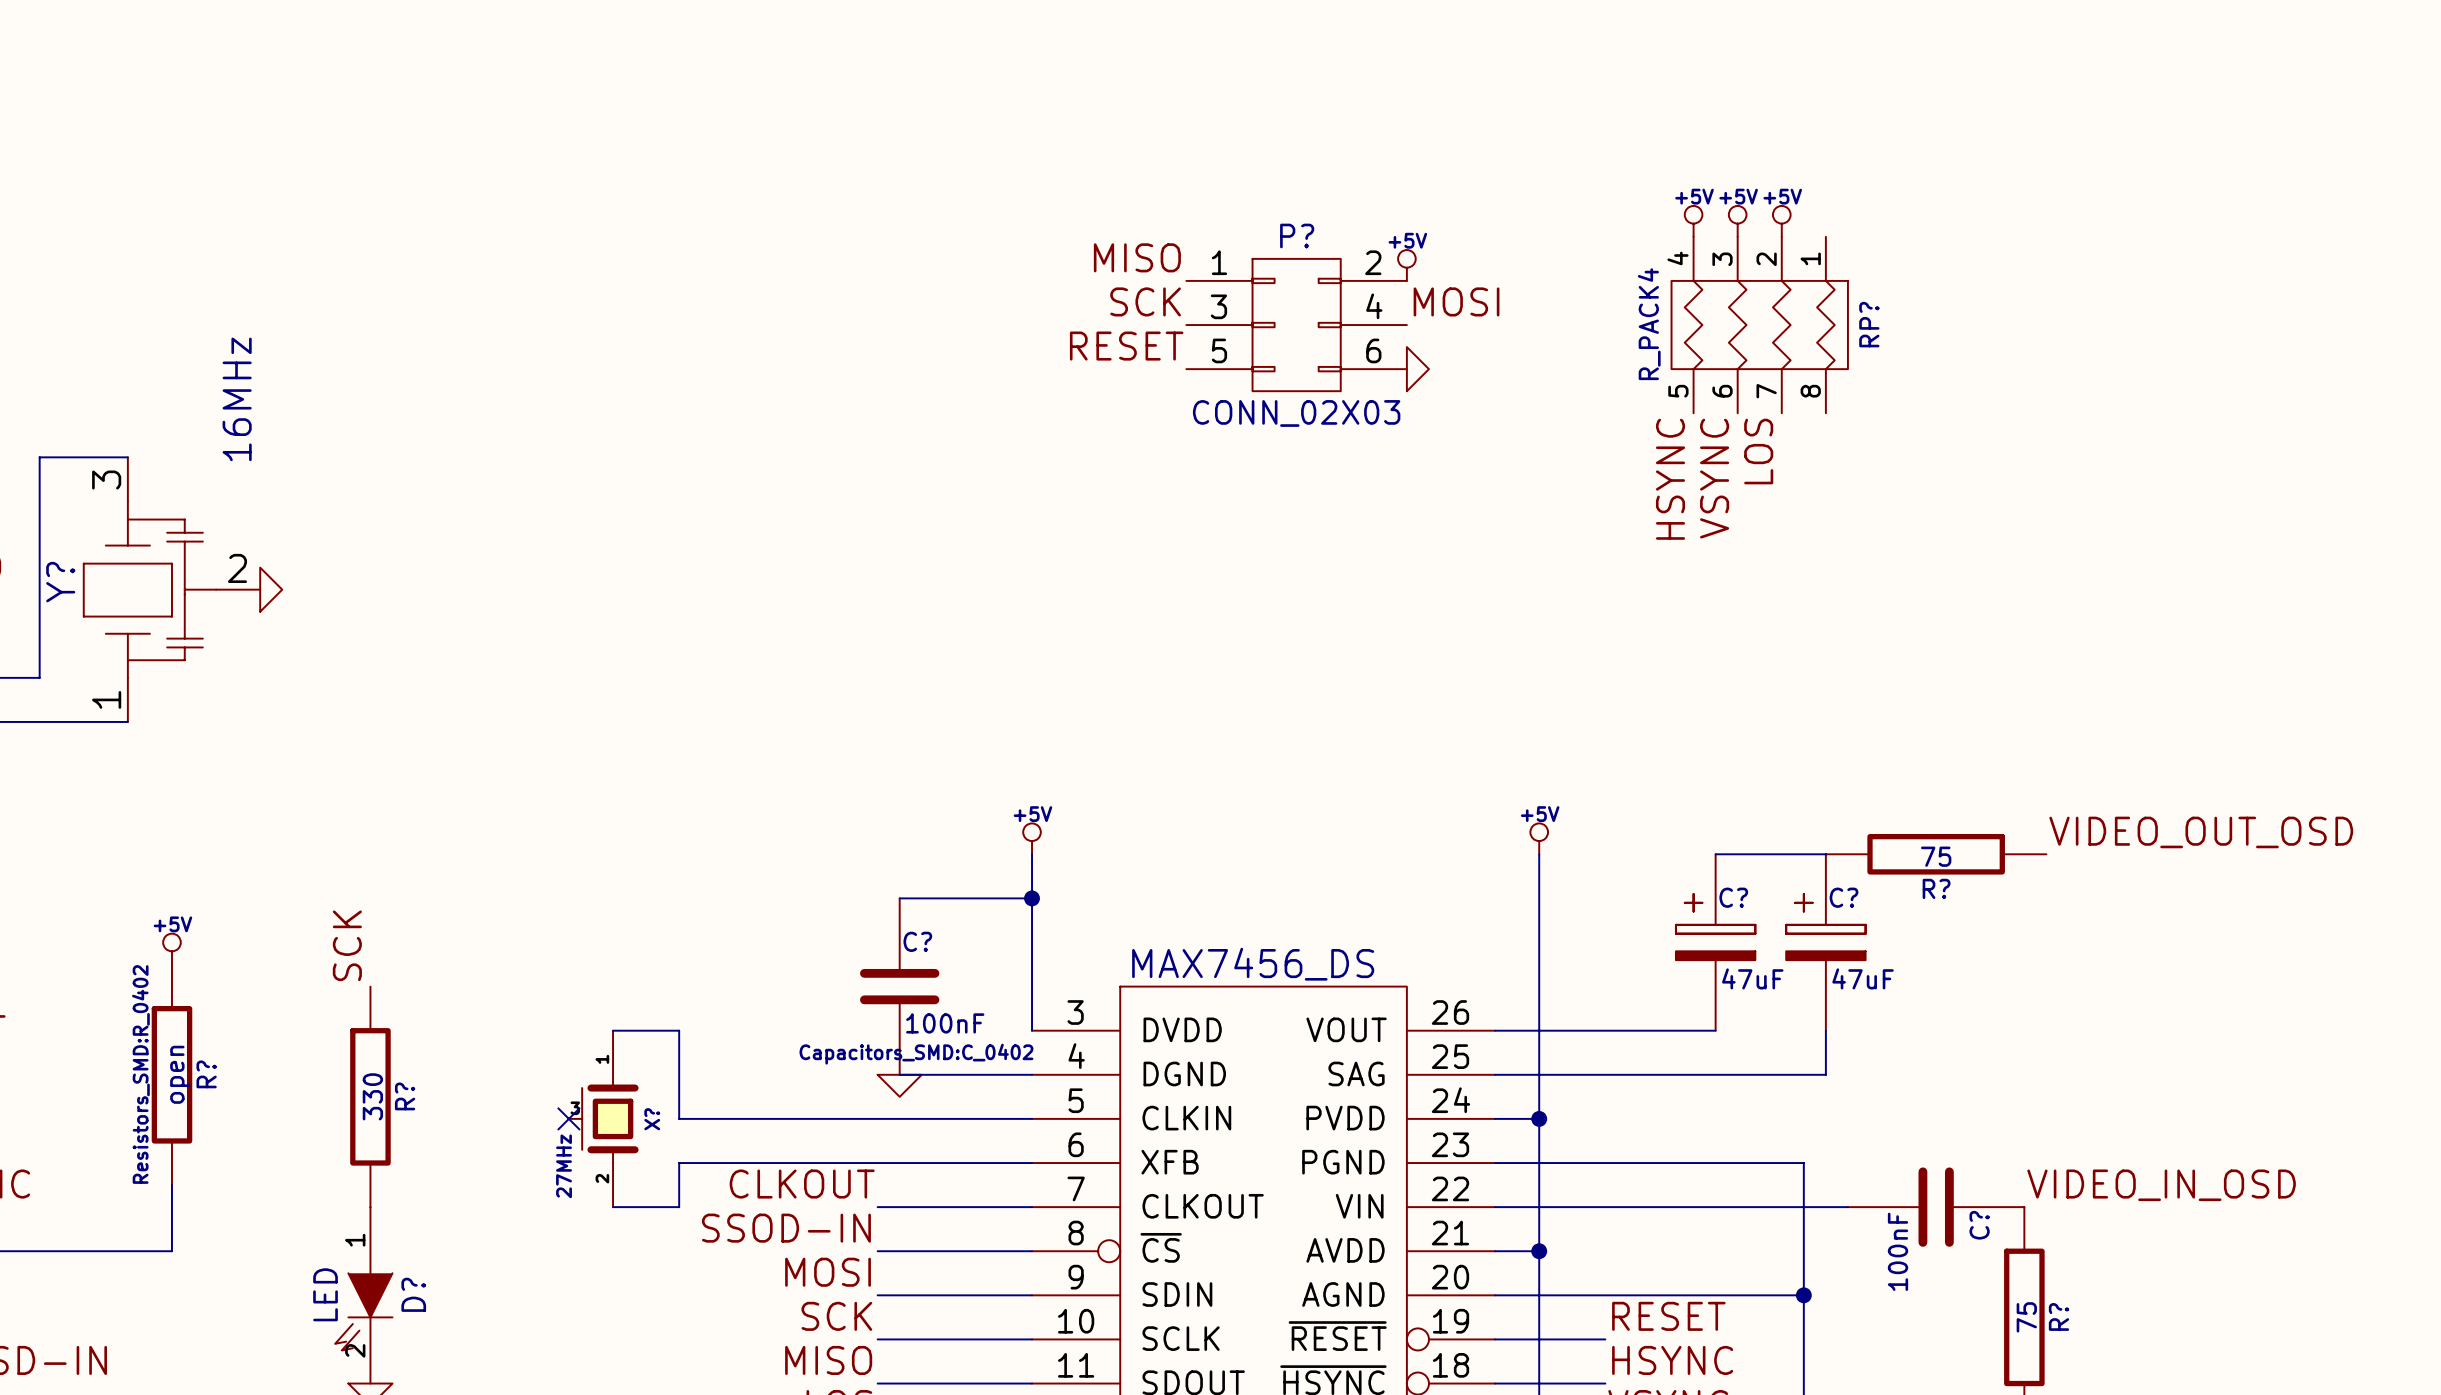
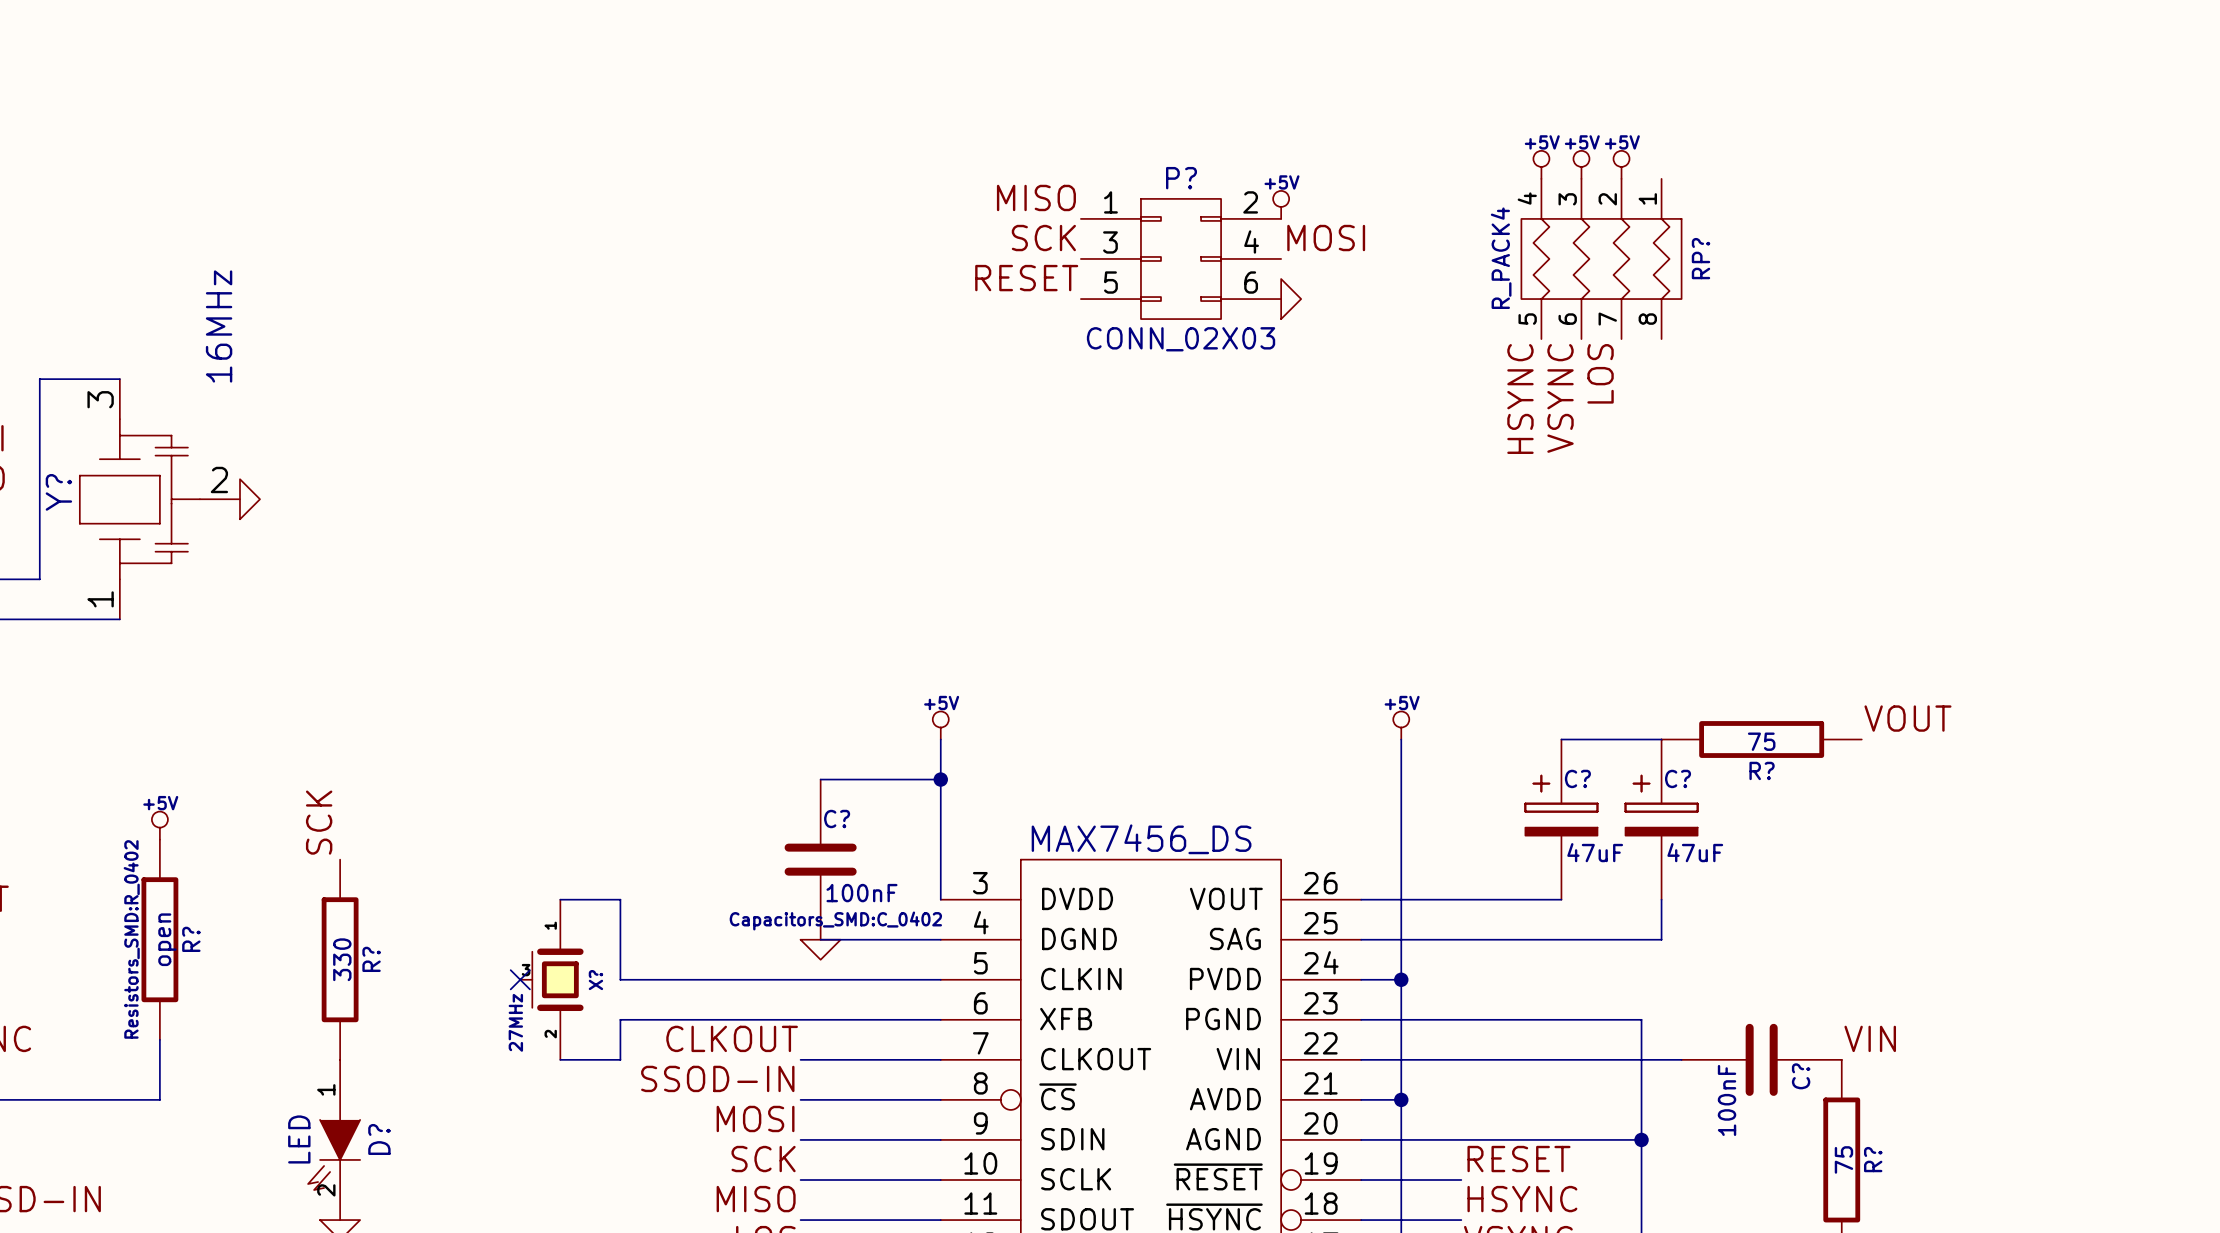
label: VIDEO_OUT_OSD (2201, 832) -> VOUT (1907, 718)
label: VIDEO_IN_OSD (2161, 1185) -> VIN (1870, 1038)

